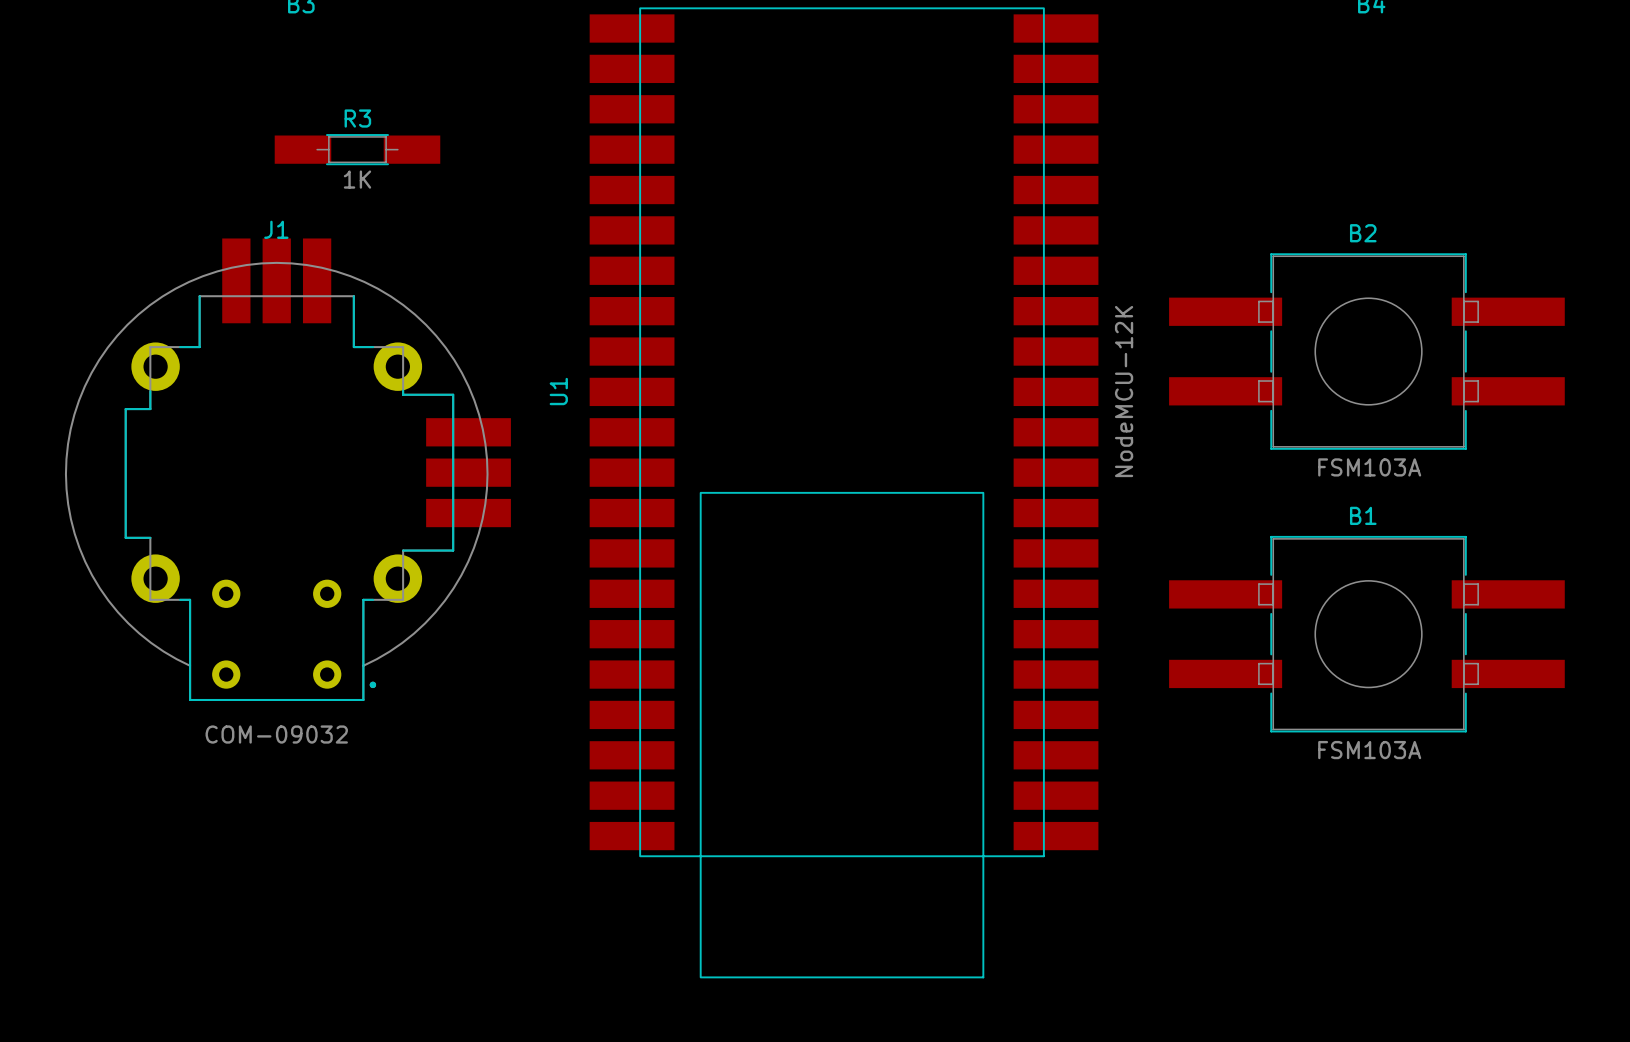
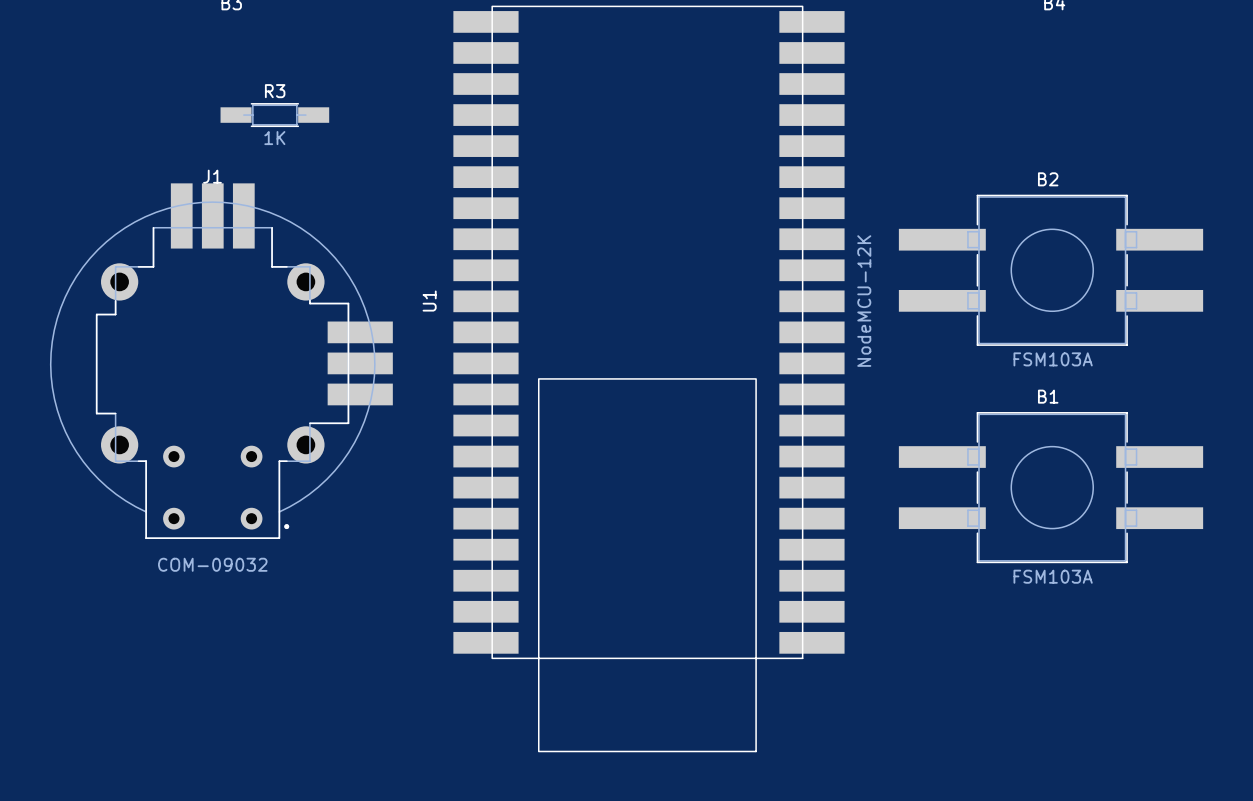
R3 footprint: [274, 134, 441, 166] -> [220, 103, 330, 128]

